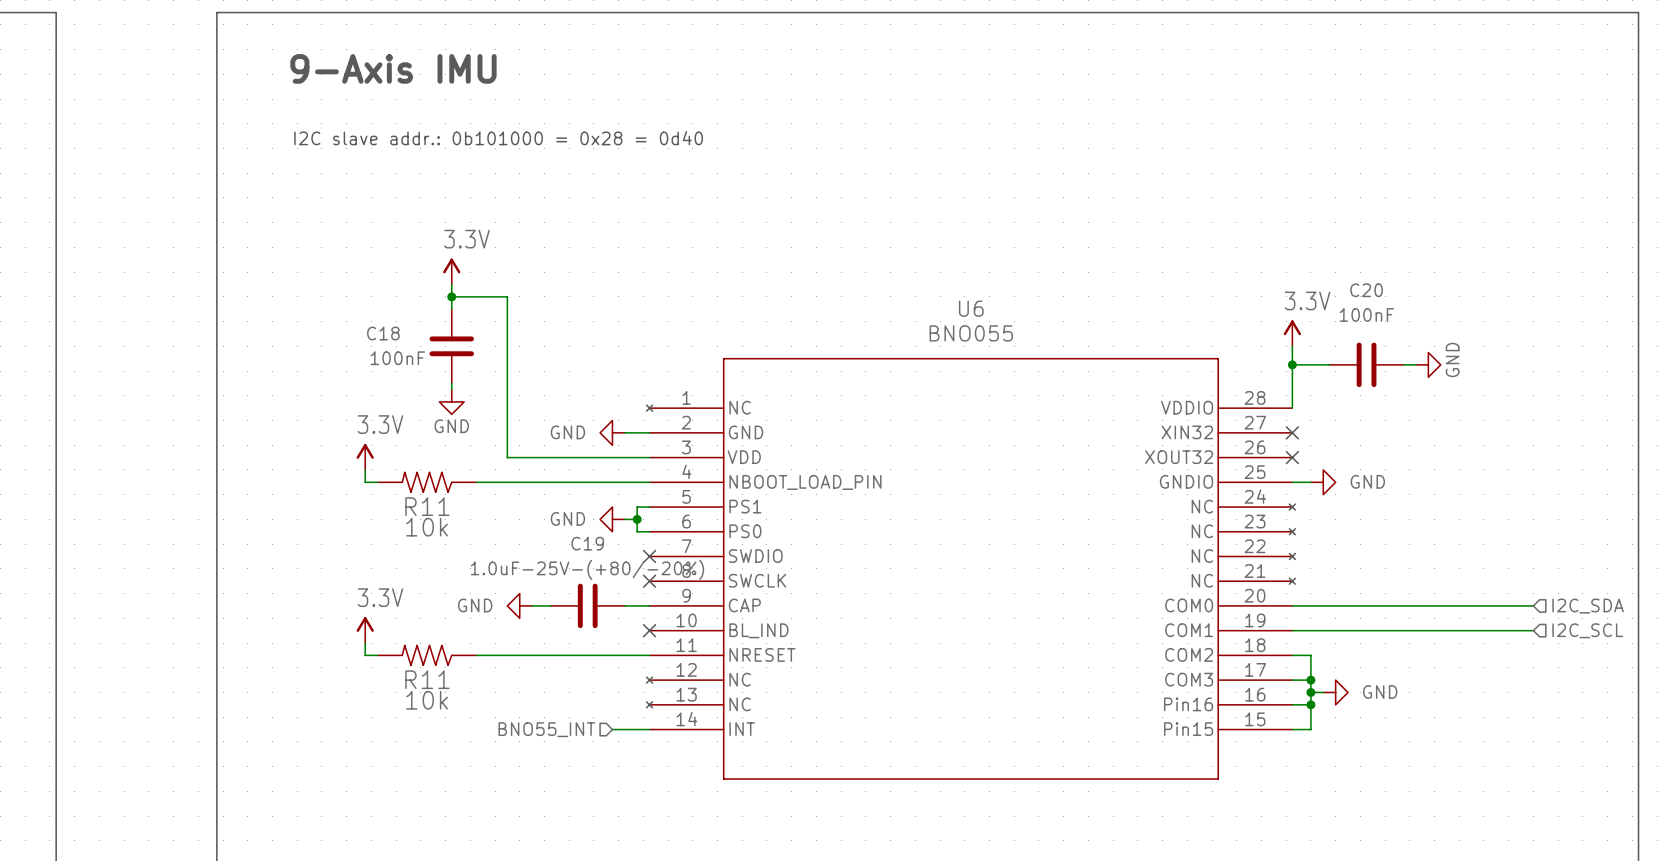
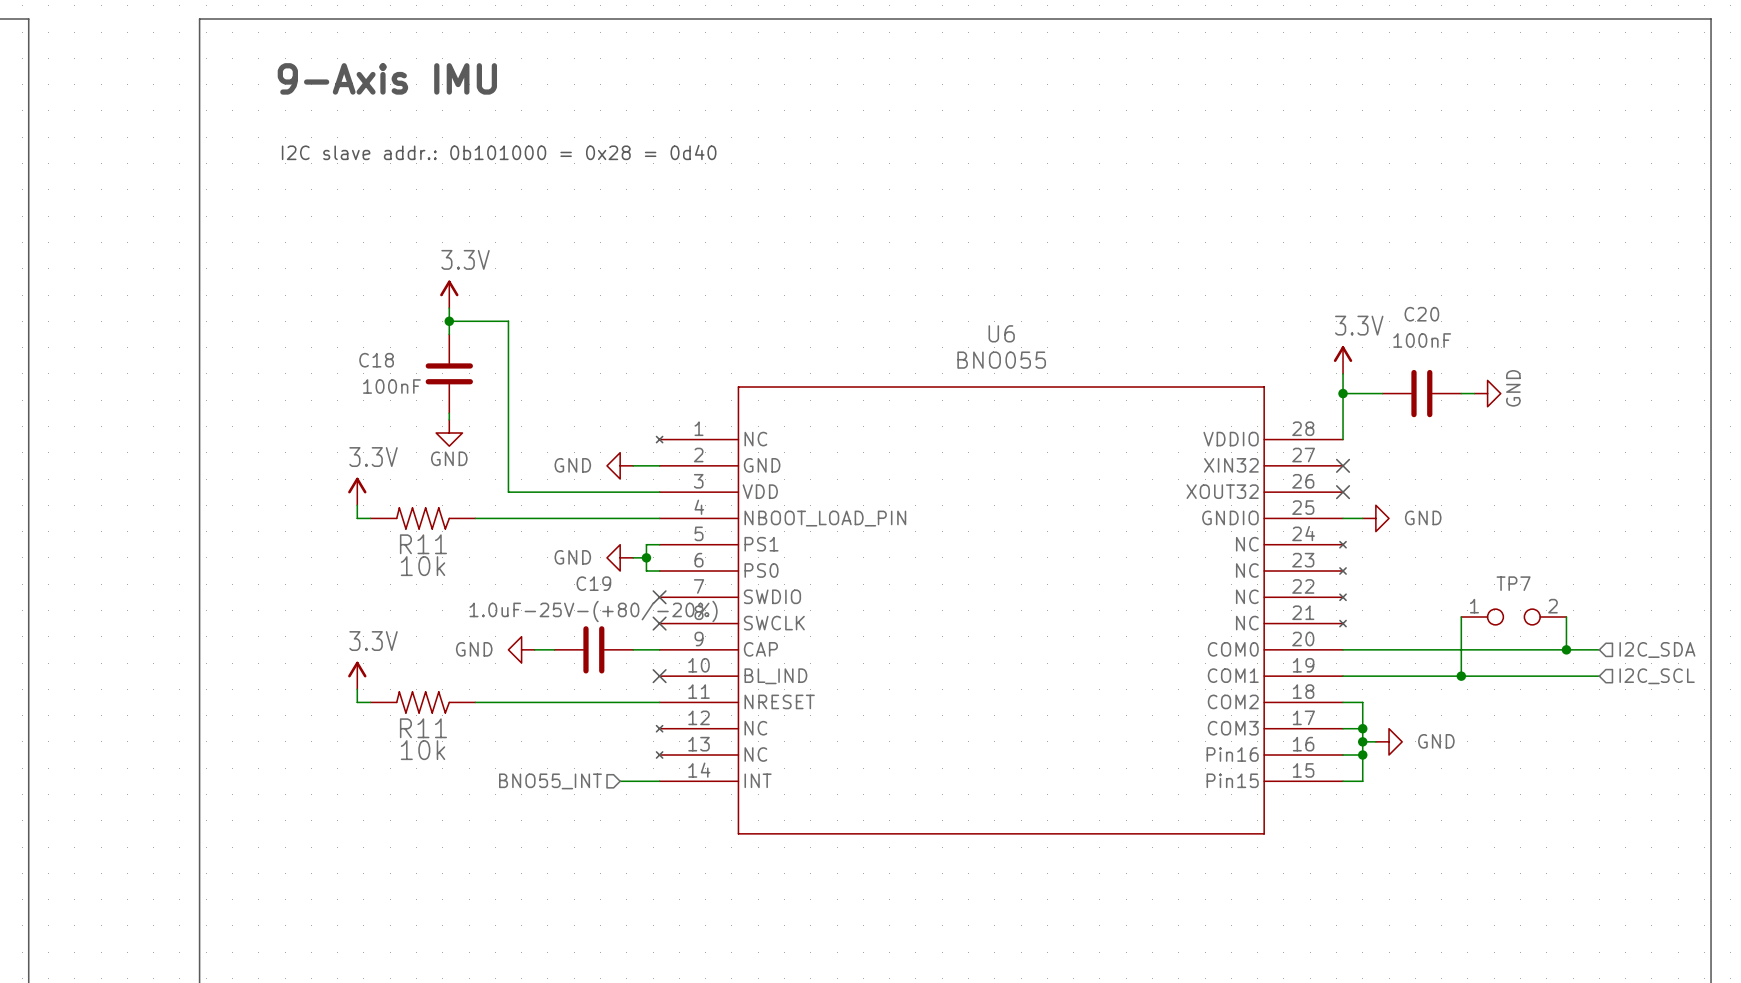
wire: none -> (1461, 617) (1461, 676)
TP7: none -> (1513, 617)
wire: none -> (1566, 617) (1566, 649)
junction: none -> (1566, 649)
junction: none -> (1461, 676)

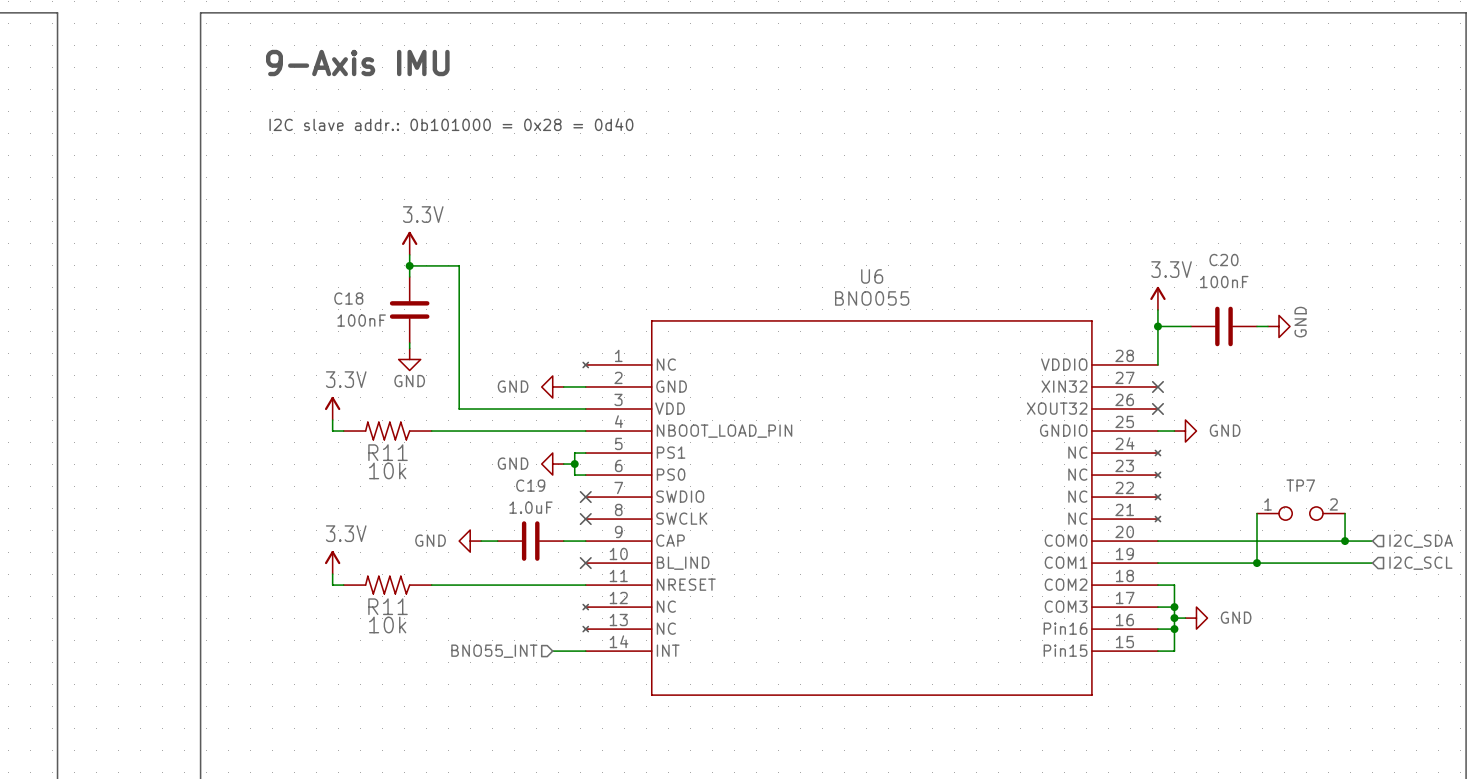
C19 value: 1.0uF-25V-(+80/-20%) (593, 611) -> 1.0uF (530, 507)

